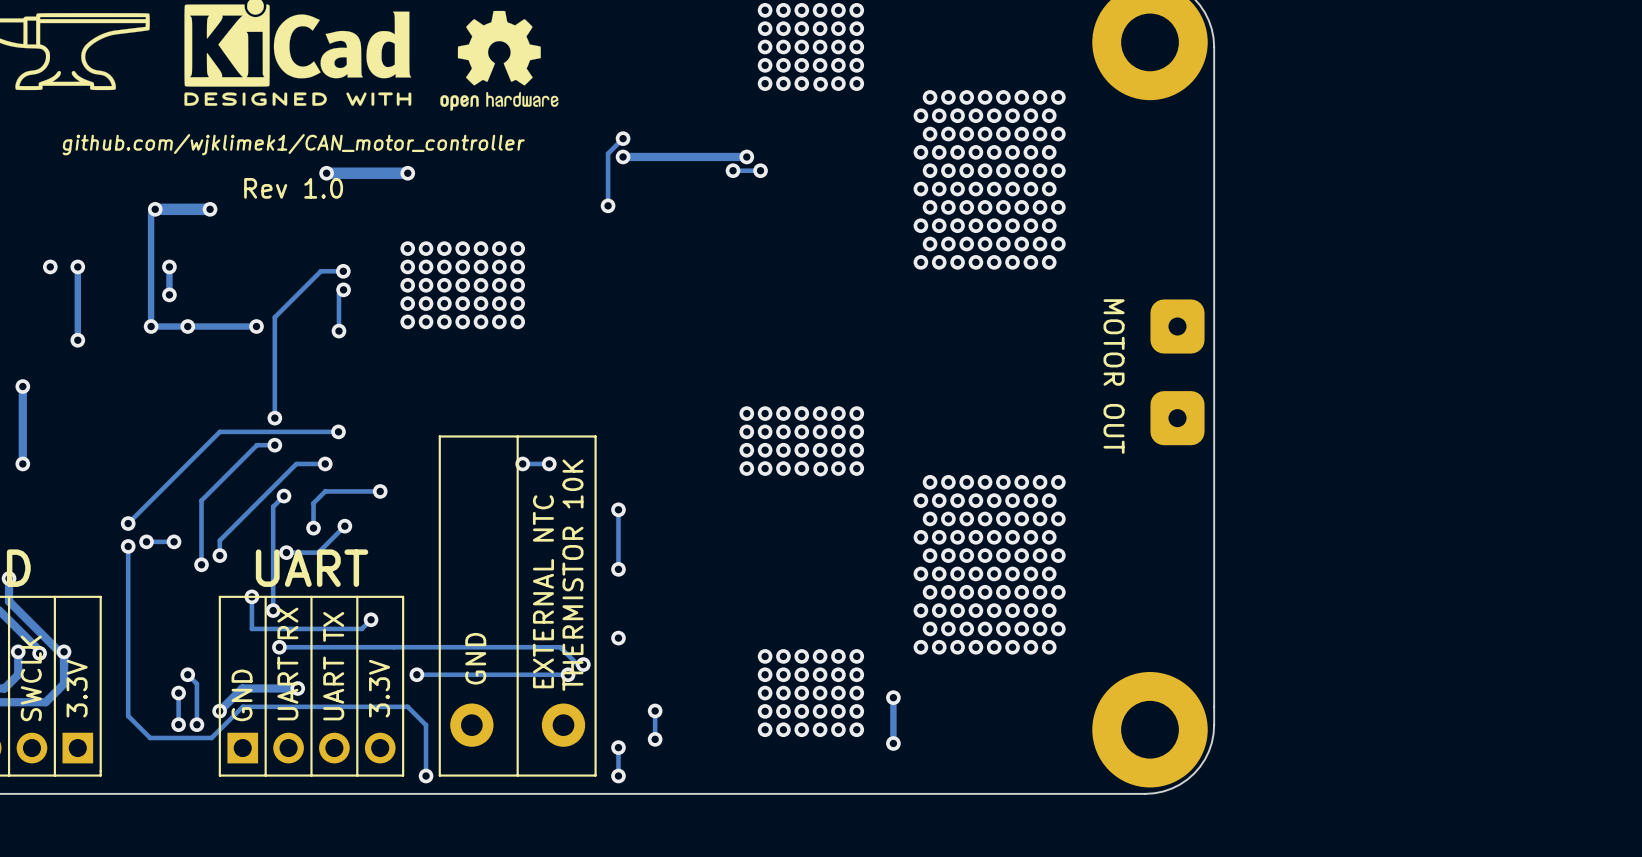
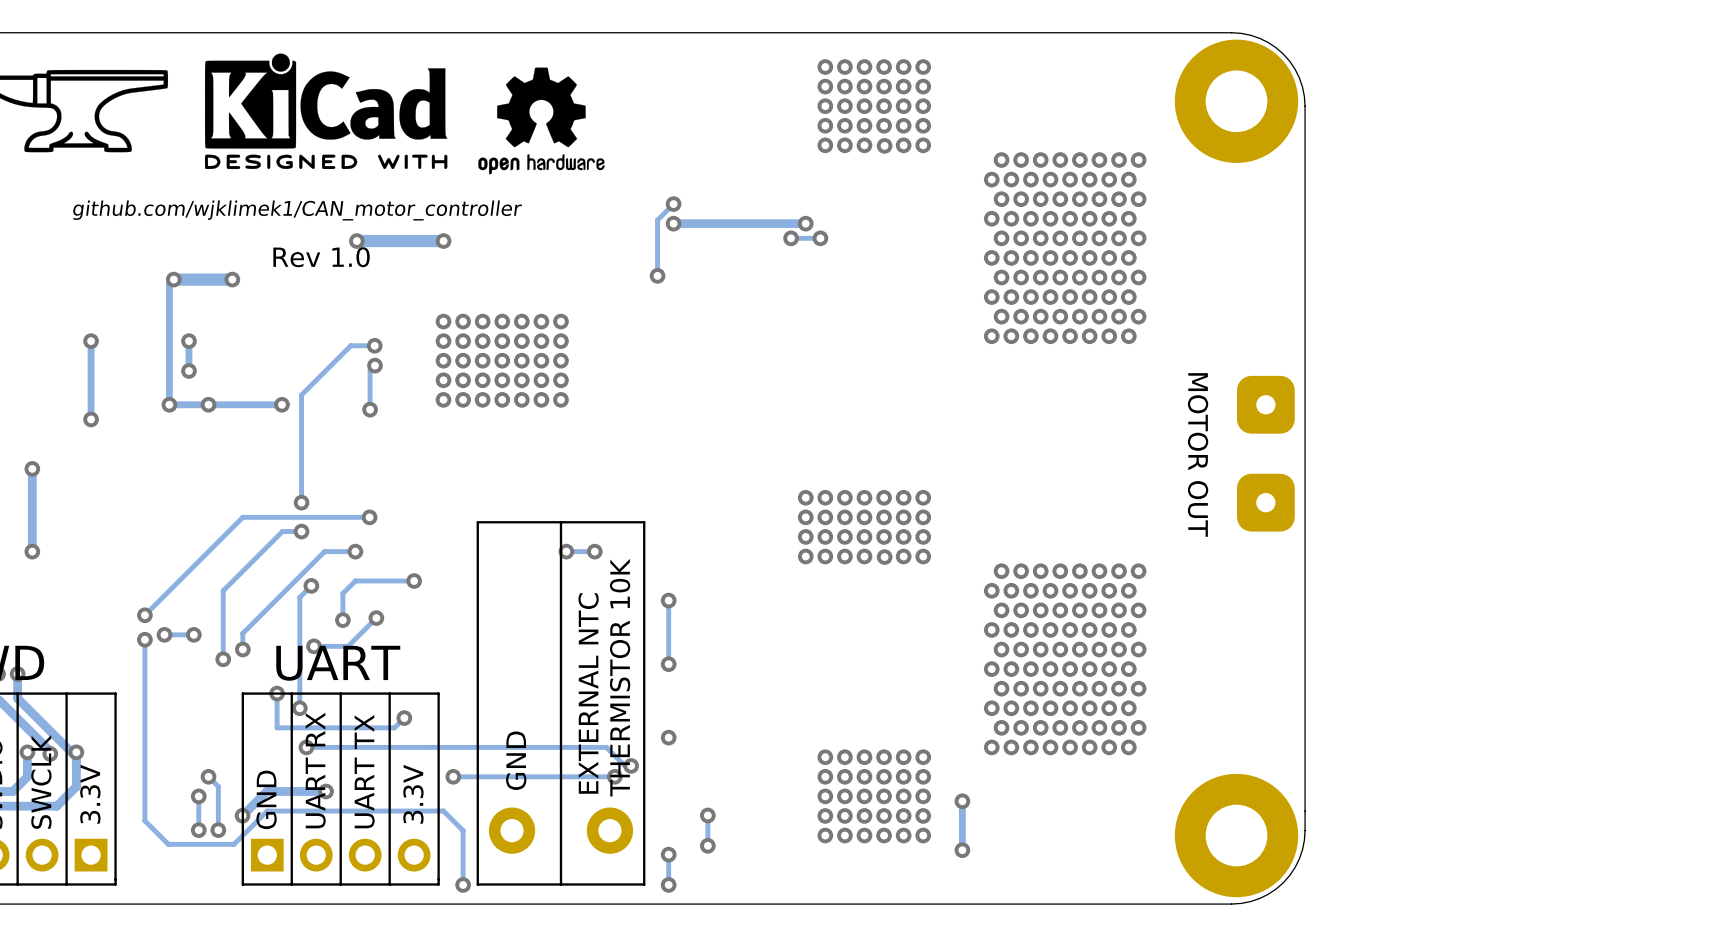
via: (50, 266) -> none

